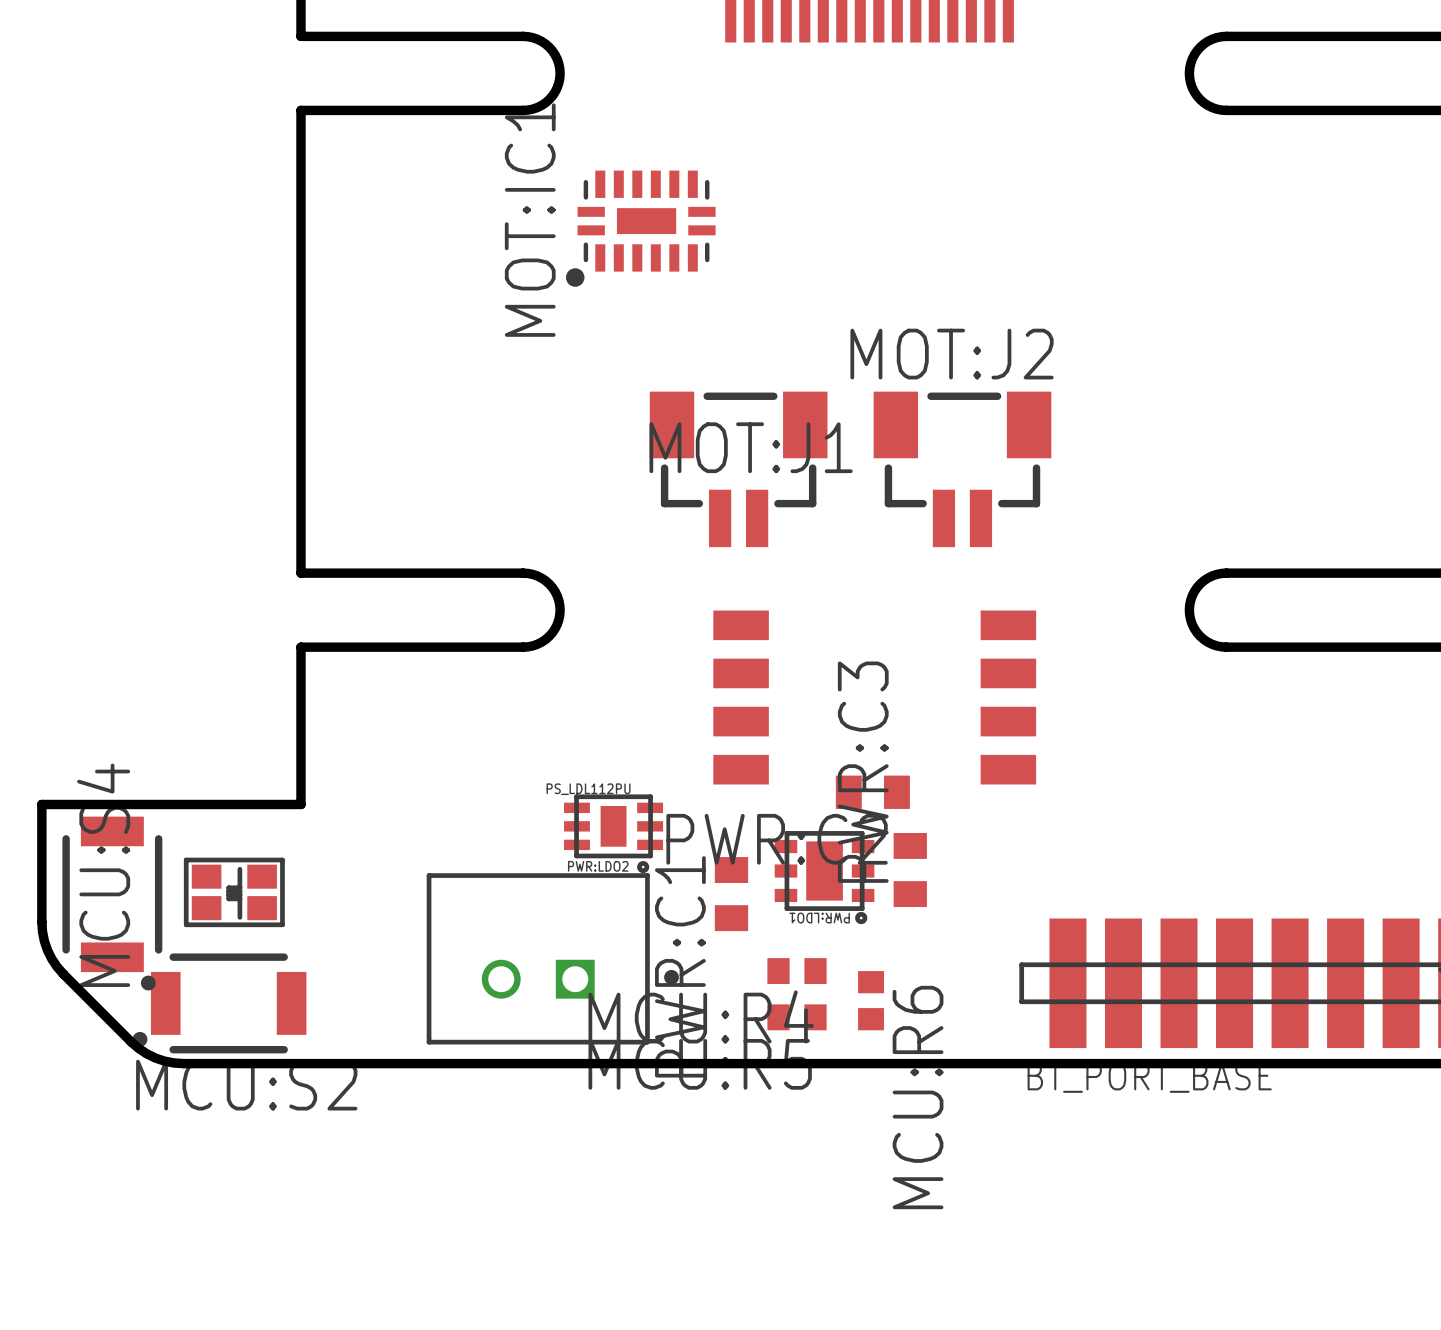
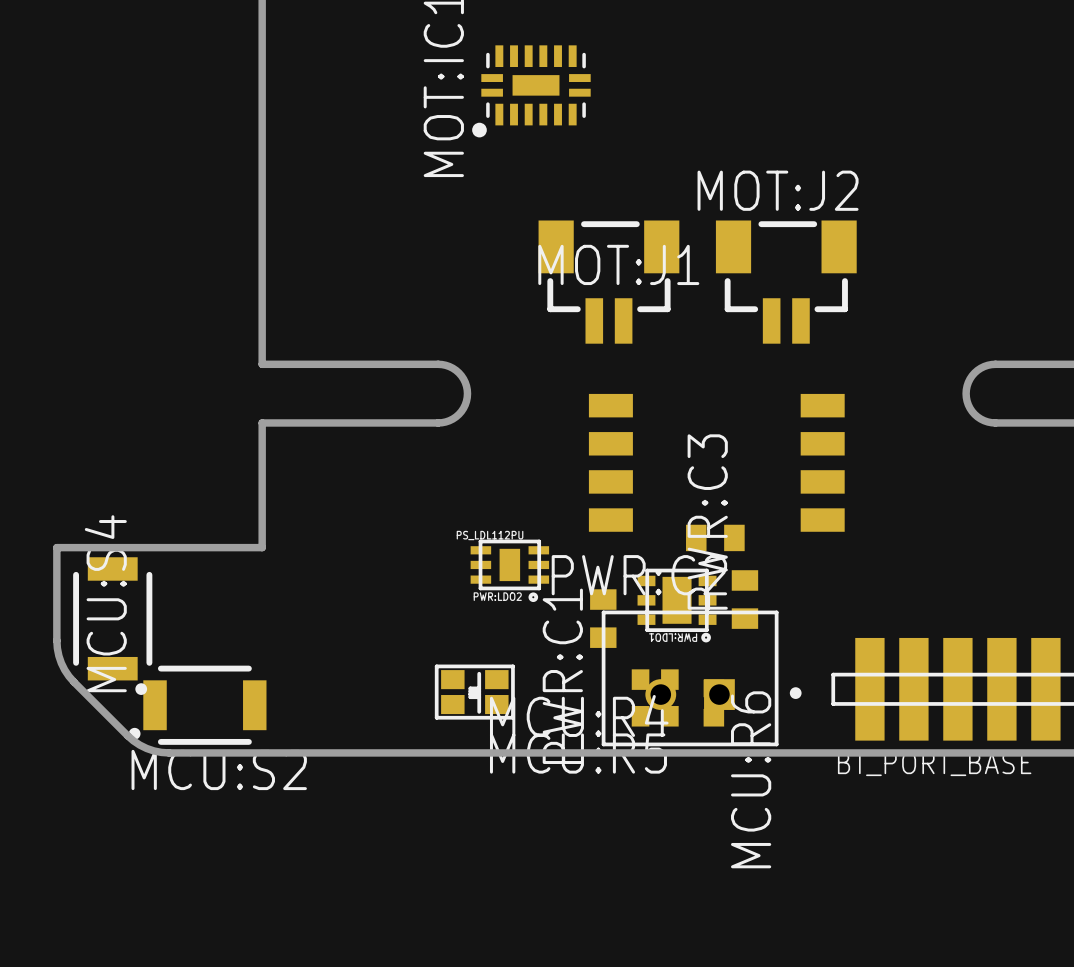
part footprint: [426, 873, 679, 1045] -> [434, 664, 515, 720]
part: (234, 892) -> none
part: none -> (701, 678)

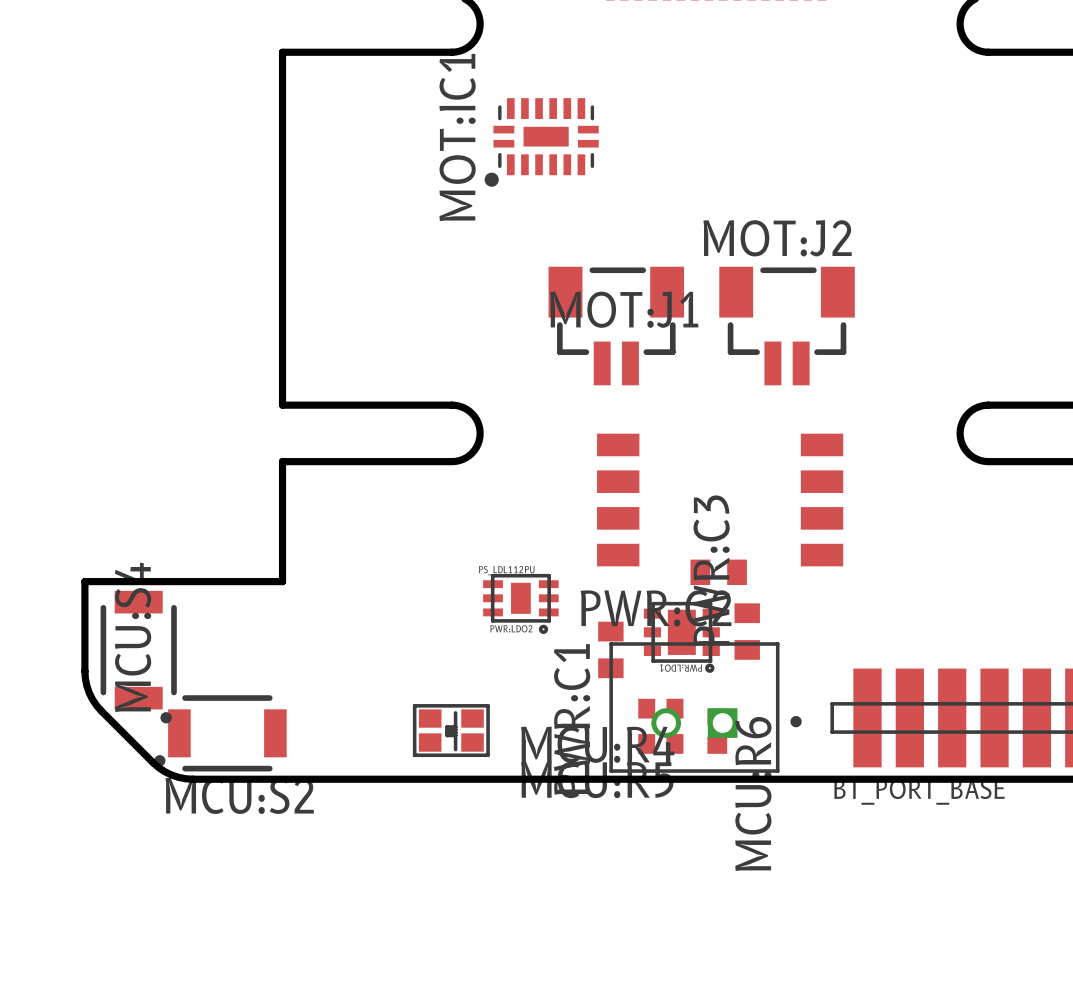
part position: (474, 692) -> (451, 730)

